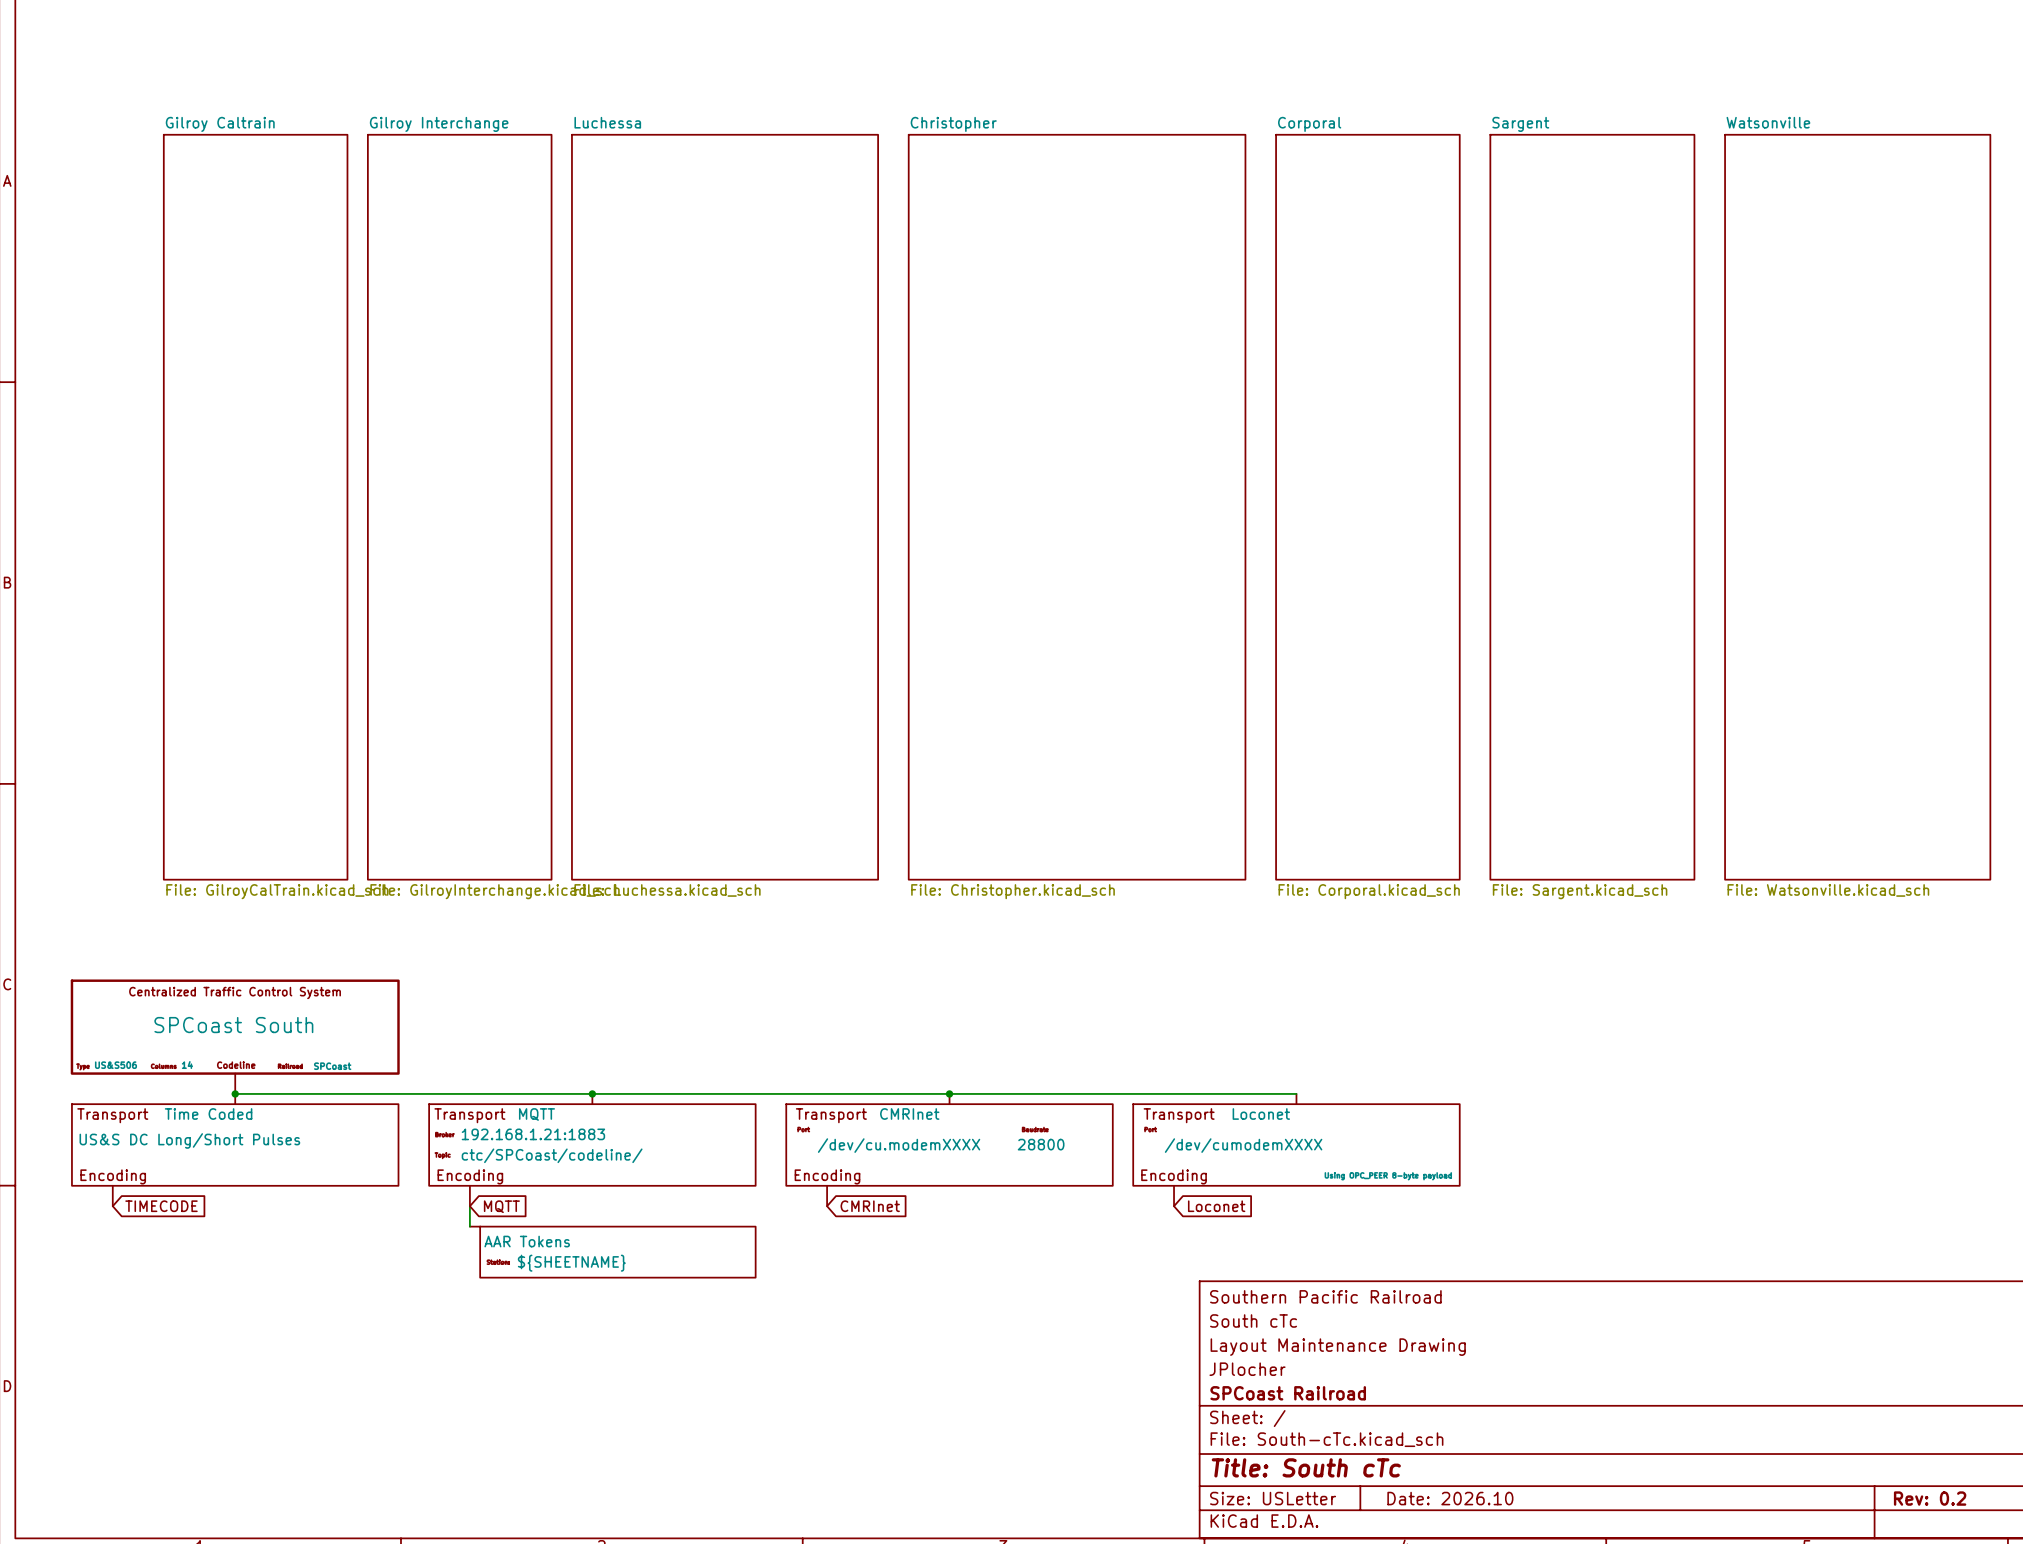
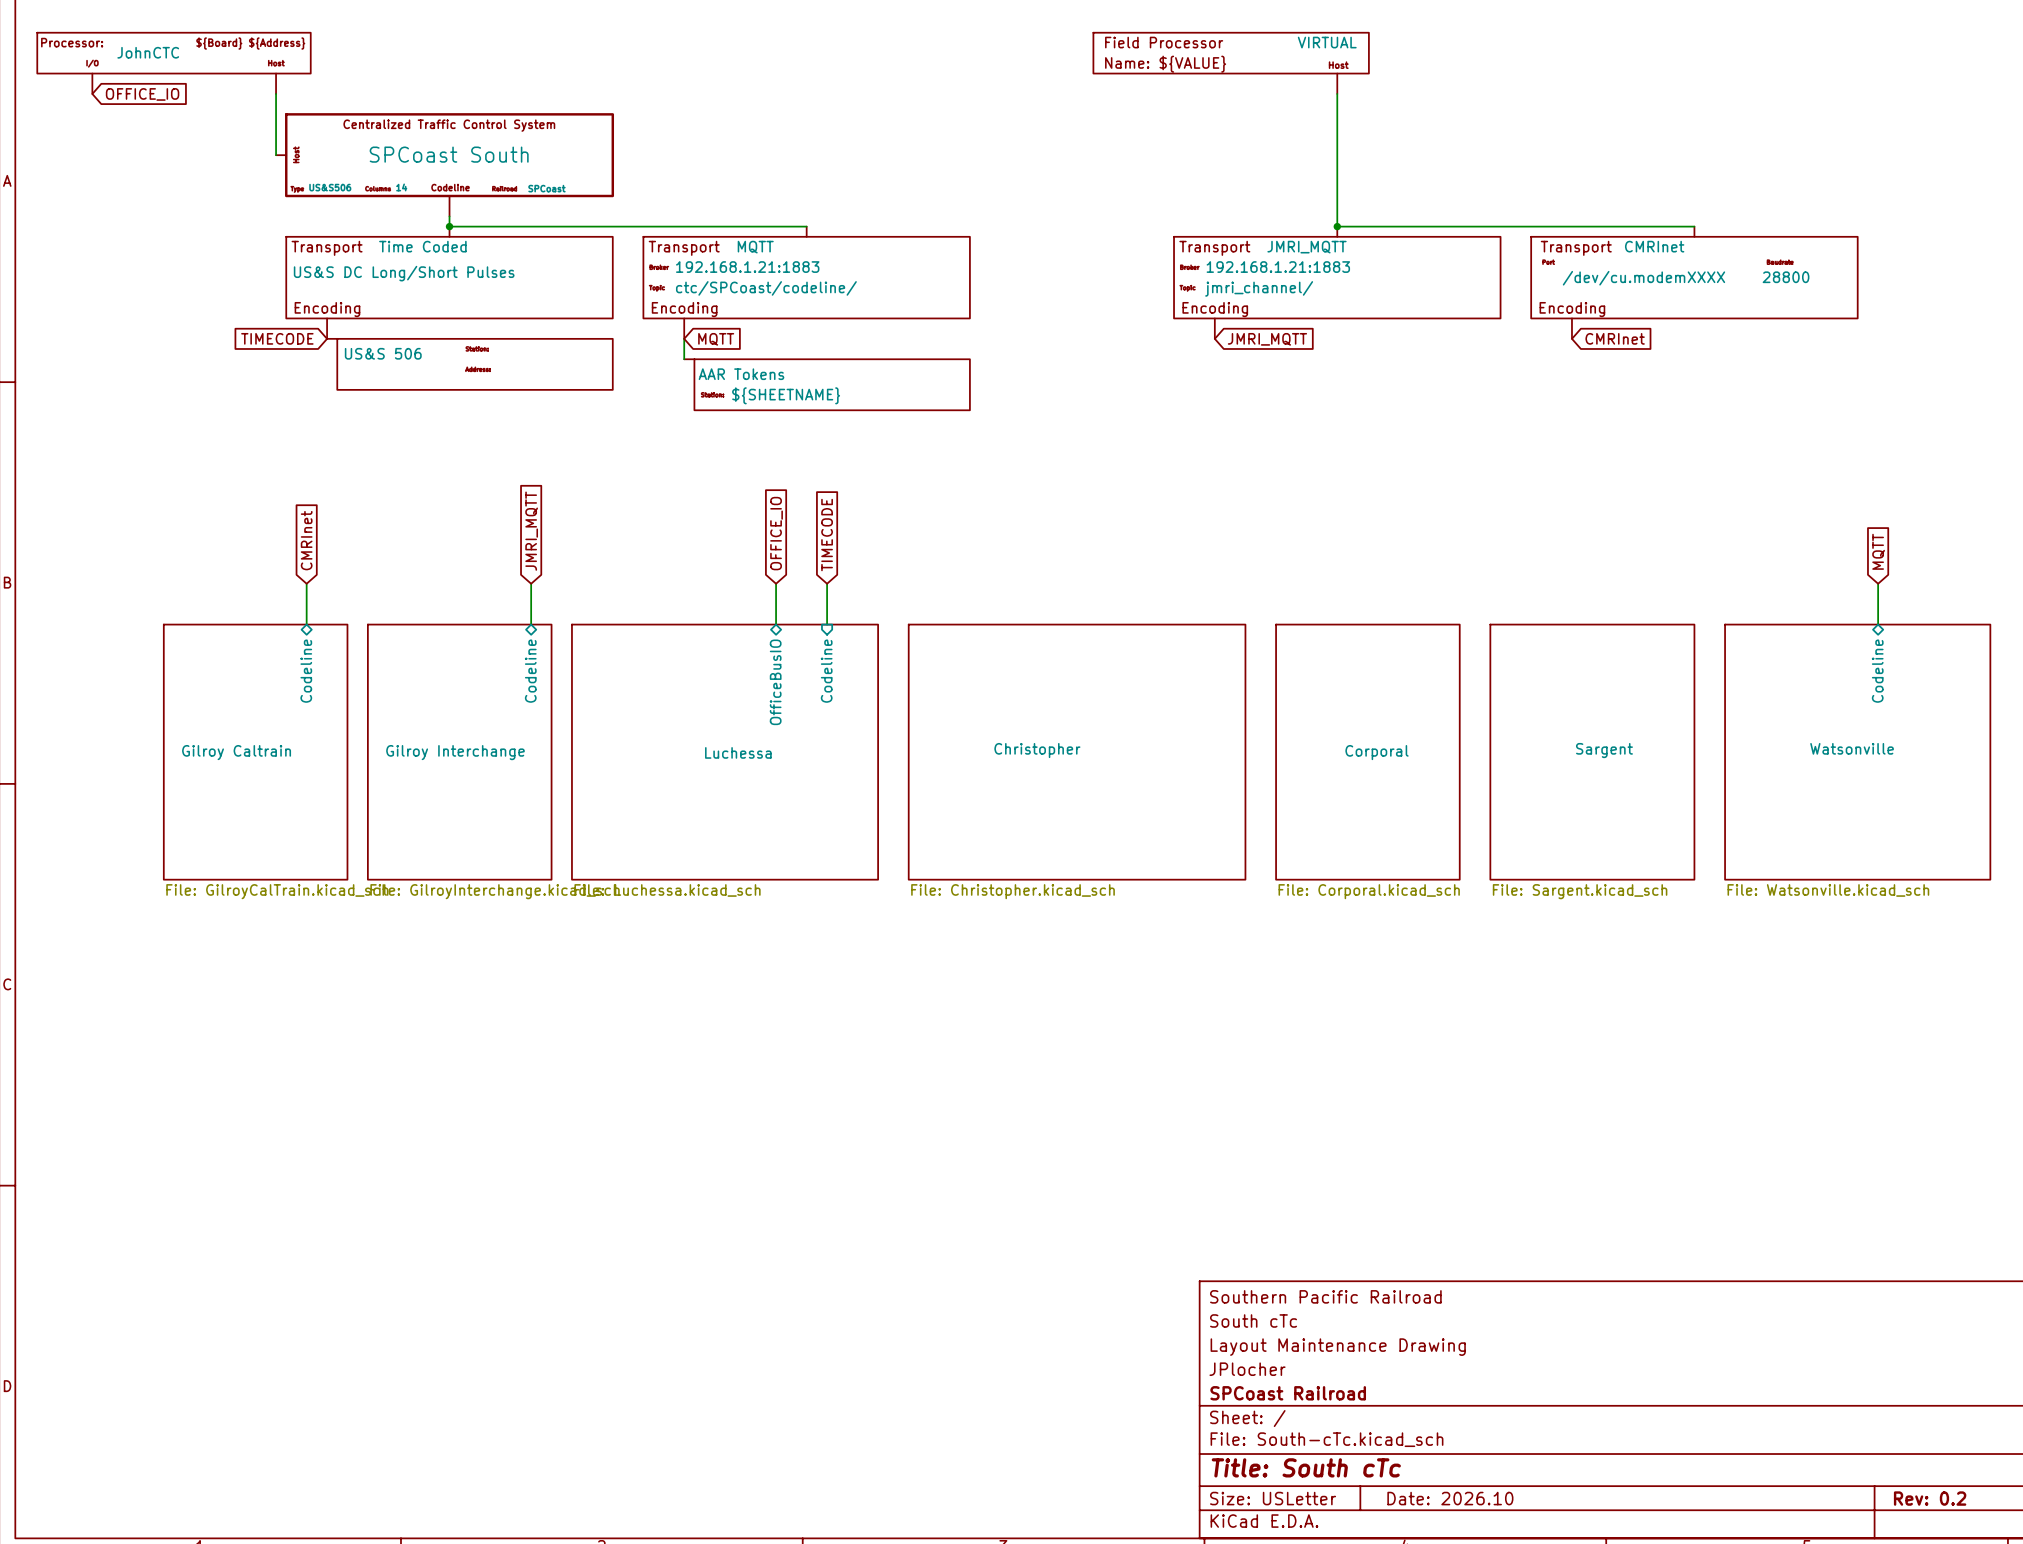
part: none -> JohnCTC (174, 63)
part: none -> (1231, 63)
wire: none -> (276, 93) (276, 155)
wire: none -> (1337, 93) (1337, 226) (1694, 226)
global label: none -> OFFICE_IO (142, 94)
part: none -> SPCoast South (445, 164)
wire: none -> (449, 216) (449, 226) (806, 226)
junction: none -> (449, 226)
junction: none -> (1337, 226)
part: none -> Time Coded (449, 282)
part: none -> MQTT (806, 282)
part: none -> JMRI_MQTT (1337, 282)
part: none -> CMRInet (1694, 282)
global label: none -> TIMECODE (277, 338)
wire: none -> (684, 338) (684, 359)
global label: none -> CMRInet (1615, 338)
global label: none -> MQTT (716, 339)
global label: none -> JMRI_MQTT (1267, 339)
part: none -> US&S 506 (469, 364)
part: none -> AAR Tokens (827, 384)
sheet Gilroy Caltrain: File: GilroyCalTrain.kicad_sch (255, 507) -> none
sheet Gilroy Interchange: File: GilroyInterchange.kicad_sch (459, 507) -> none
sheet Luchessa: File: Luchessa.kicad_sch (725, 507) -> none
sheet Christopher: File: Christopher.kicad_sch (1077, 507) -> none
sheet Corporal: File: Corporal.kicad_sch (1367, 507) -> none
sheet Sargent: File: Sargent.kicad_sch (1592, 507) -> none
sheet Watsonville: File: Watsonville.kicad_sch (1857, 507) -> none
global label: none -> JMRI_MQTT (531, 531)
global label: none -> OFFICE_IO (776, 533)
global label: none -> TIMECODE (827, 535)
global label: none -> CMRInet (306, 540)
global label: none -> MQTT (1878, 551)
wire: none -> (306, 583) (306, 624)
wire: none -> (531, 583) (531, 624)
wire: none -> (776, 583) (776, 624)
wire: none -> (827, 583) (827, 624)
wire: none -> (1878, 583) (1878, 624)
sheet pin: none -> Codeline (306, 671)
sheet pin: none -> Codeline (530, 671)
sheet pin: none -> Codeline (826, 671)
sheet pin: none -> Codeline (1877, 671)
sheet pin: none -> OfficeBusIO (775, 682)
sheet Gilroy Caltrain: none -> File: GilroyCalTrain.kicad_sch (255, 752)
sheet Gilroy Interchange: none -> File: GilroyInterchange.kicad_sch (459, 752)
sheet Luchessa: none -> File: Luchessa.kicad_sch (725, 752)
sheet Christopher: none -> File: Christopher.kicad_sch (1077, 752)
sheet Corporal: none -> File: Corporal.kicad_sch (1367, 752)
sheet Sargent: none -> File: Sargent.kicad_sch (1592, 752)
sheet Watsonville: none -> File: Watsonville.kicad_sch (1857, 752)
part: SPCoast South (235, 1036) -> none
wire: (235, 1093) (1296, 1093) -> none
junction: (235, 1093) -> none
junction: (592, 1093) -> none
junction: (949, 1093) -> none
part: Time Coded (235, 1150) -> none
part: MQTT (592, 1150) -> none
part: CMRInet (949, 1150) -> none
part: Loconet (1296, 1150) -> none
global label: TIMECODE (161, 1206) -> none
wire: (469, 1206) (469, 1226) -> none
global label: MQTT (501, 1206) -> none
global label: CMRInet (870, 1206) -> none
global label: Loconet (1216, 1206) -> none
part: AAR Tokens (612, 1252) -> none

